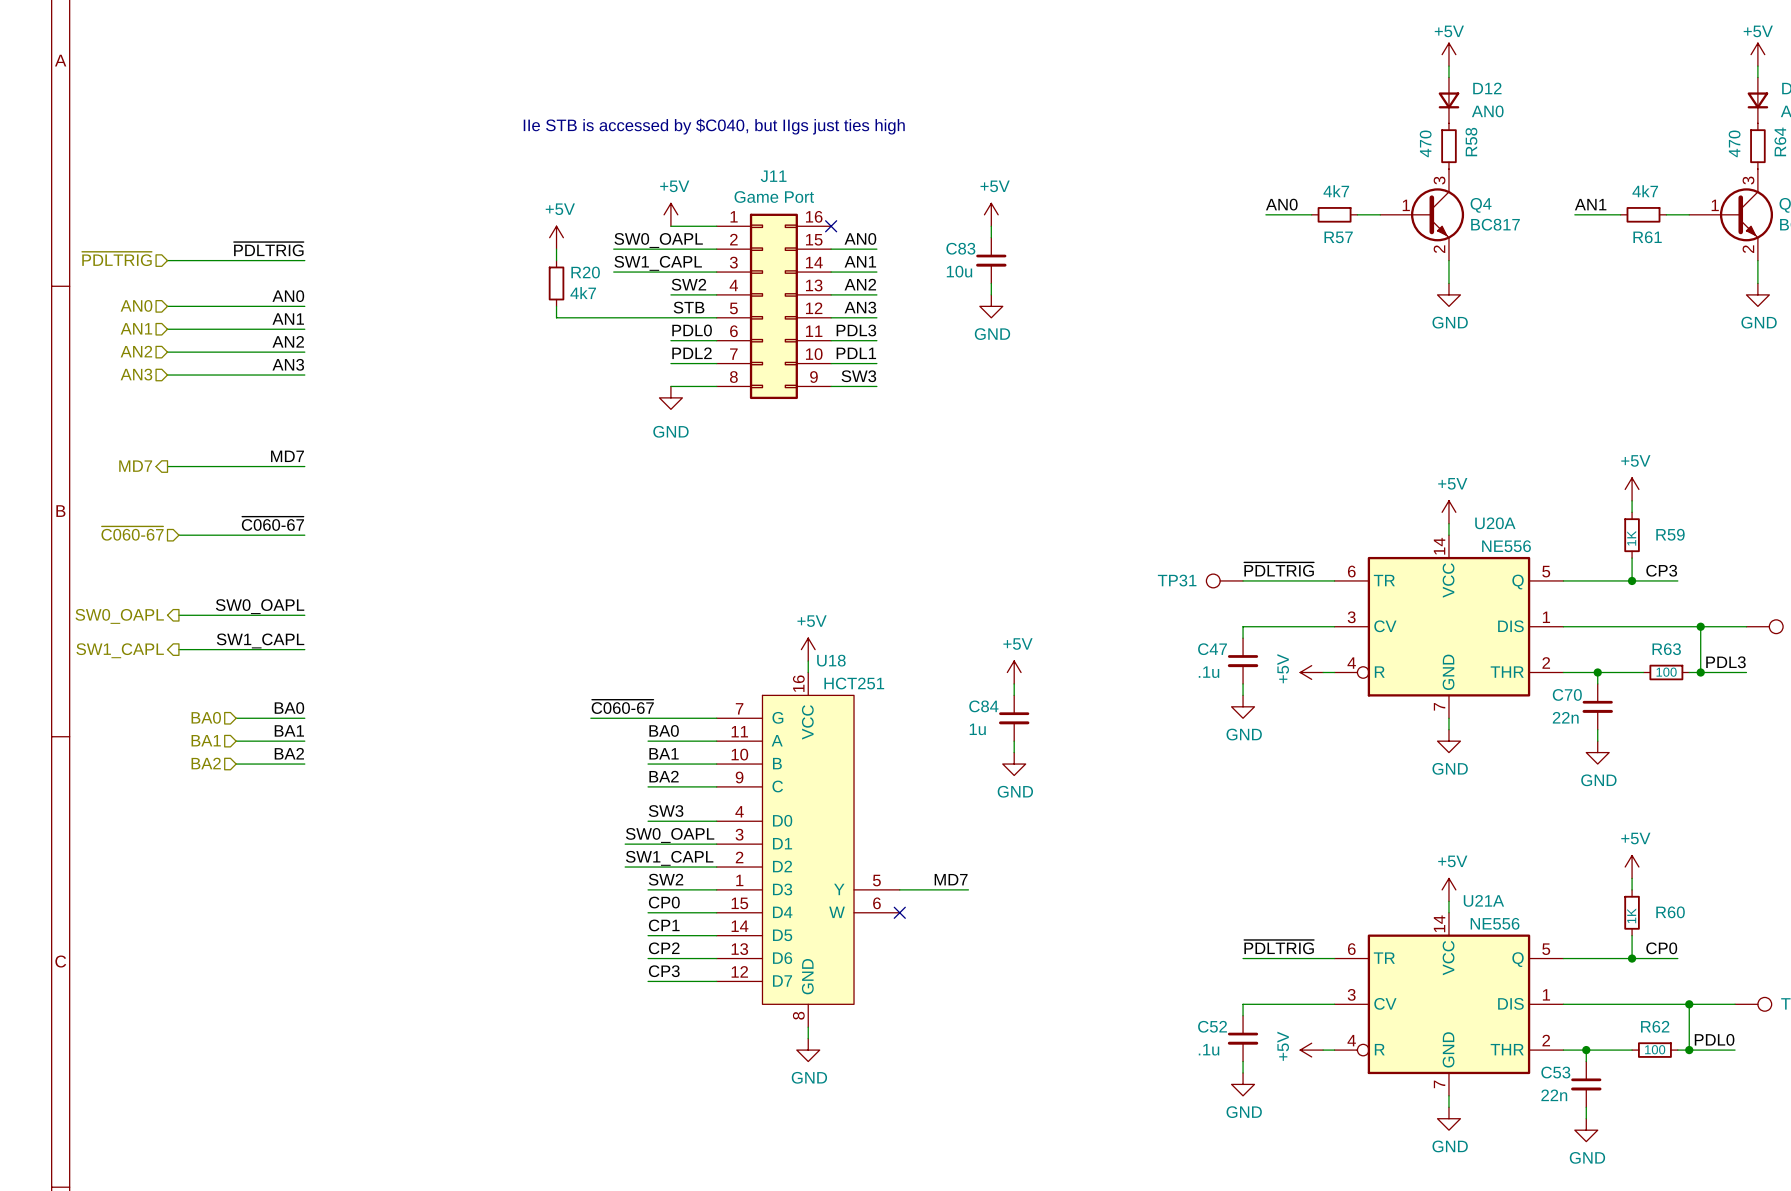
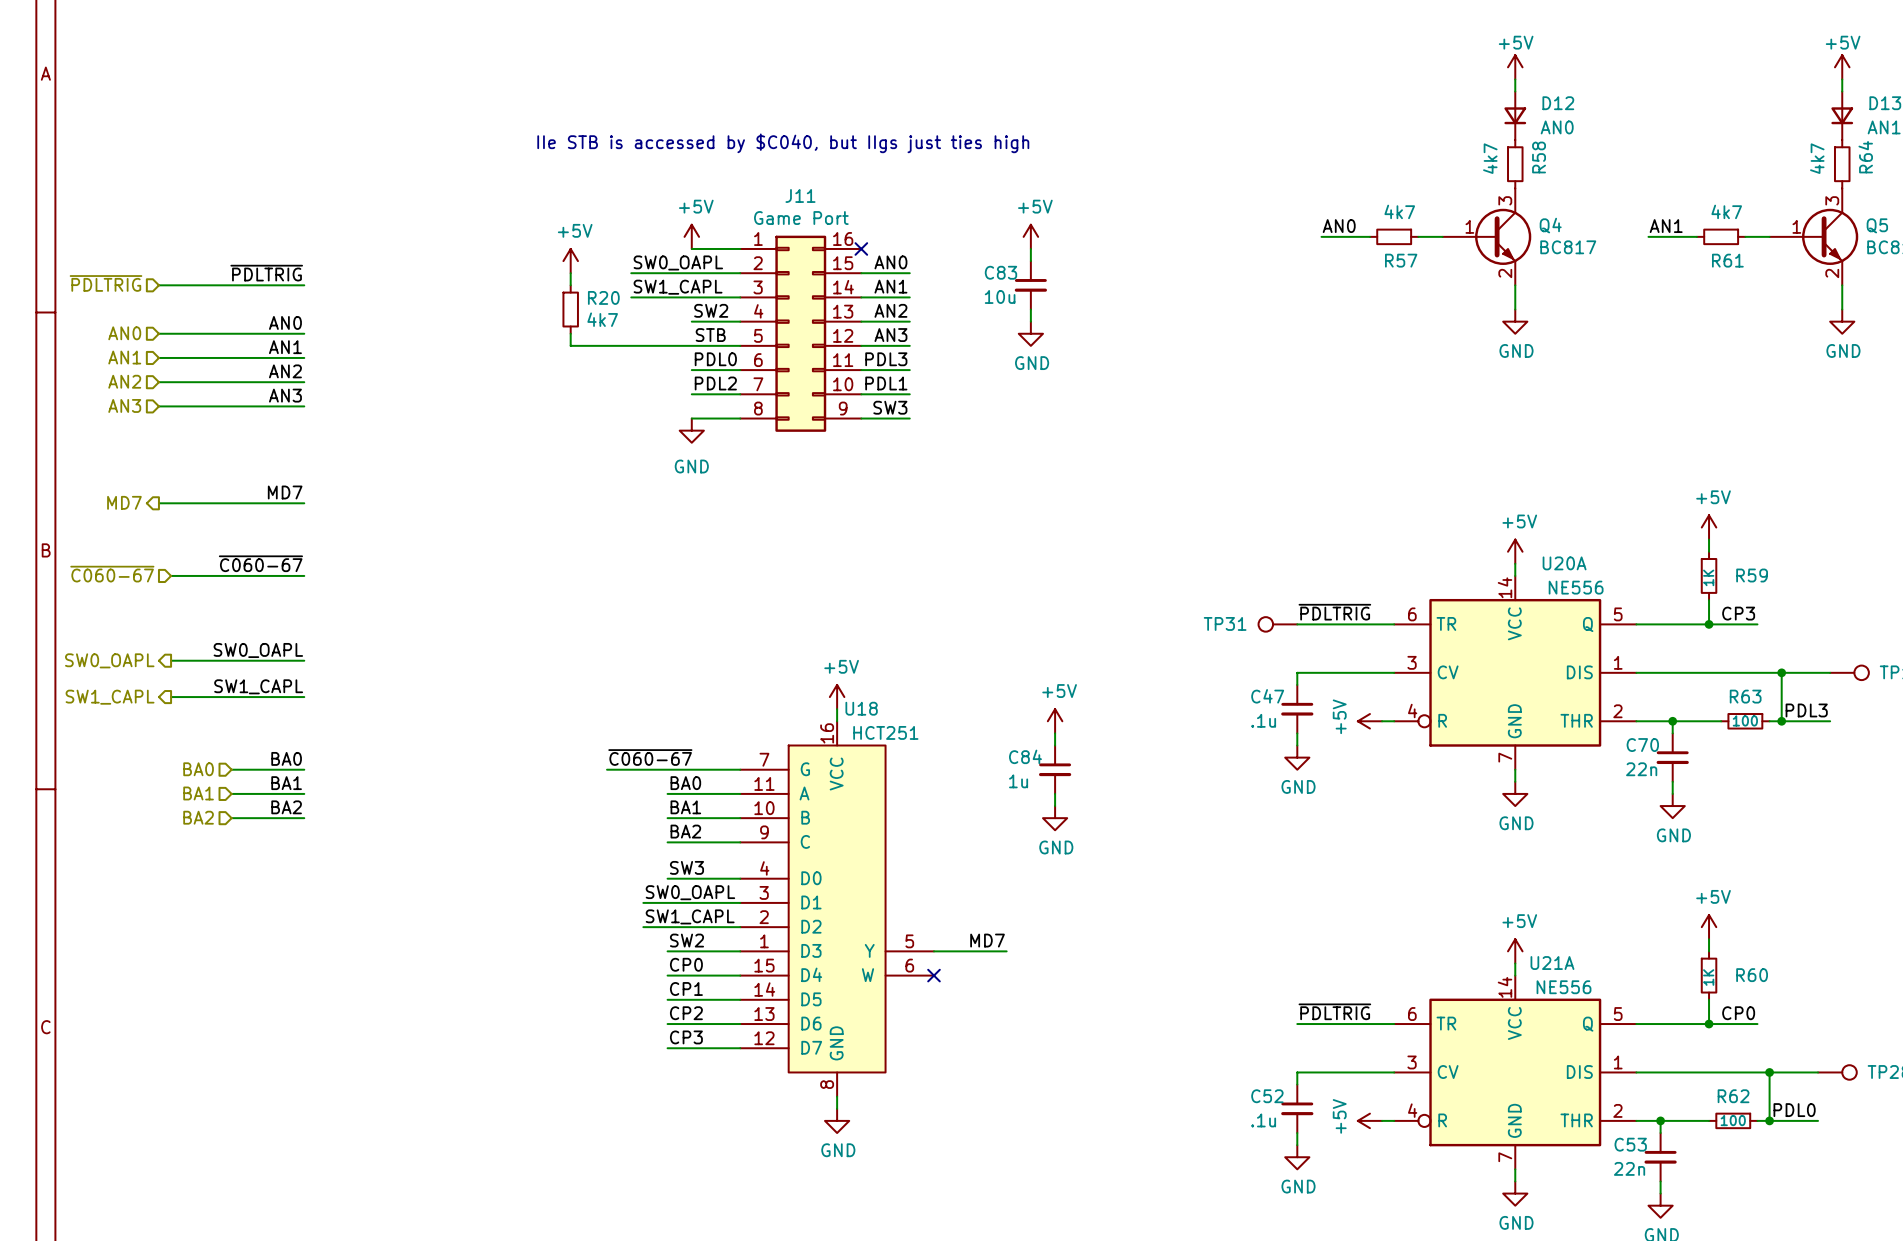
R58 value: 470 (1425, 143) -> 4k7 (1490, 158)
R64 value: 470 (1734, 143) -> 4k7 (1817, 158)

